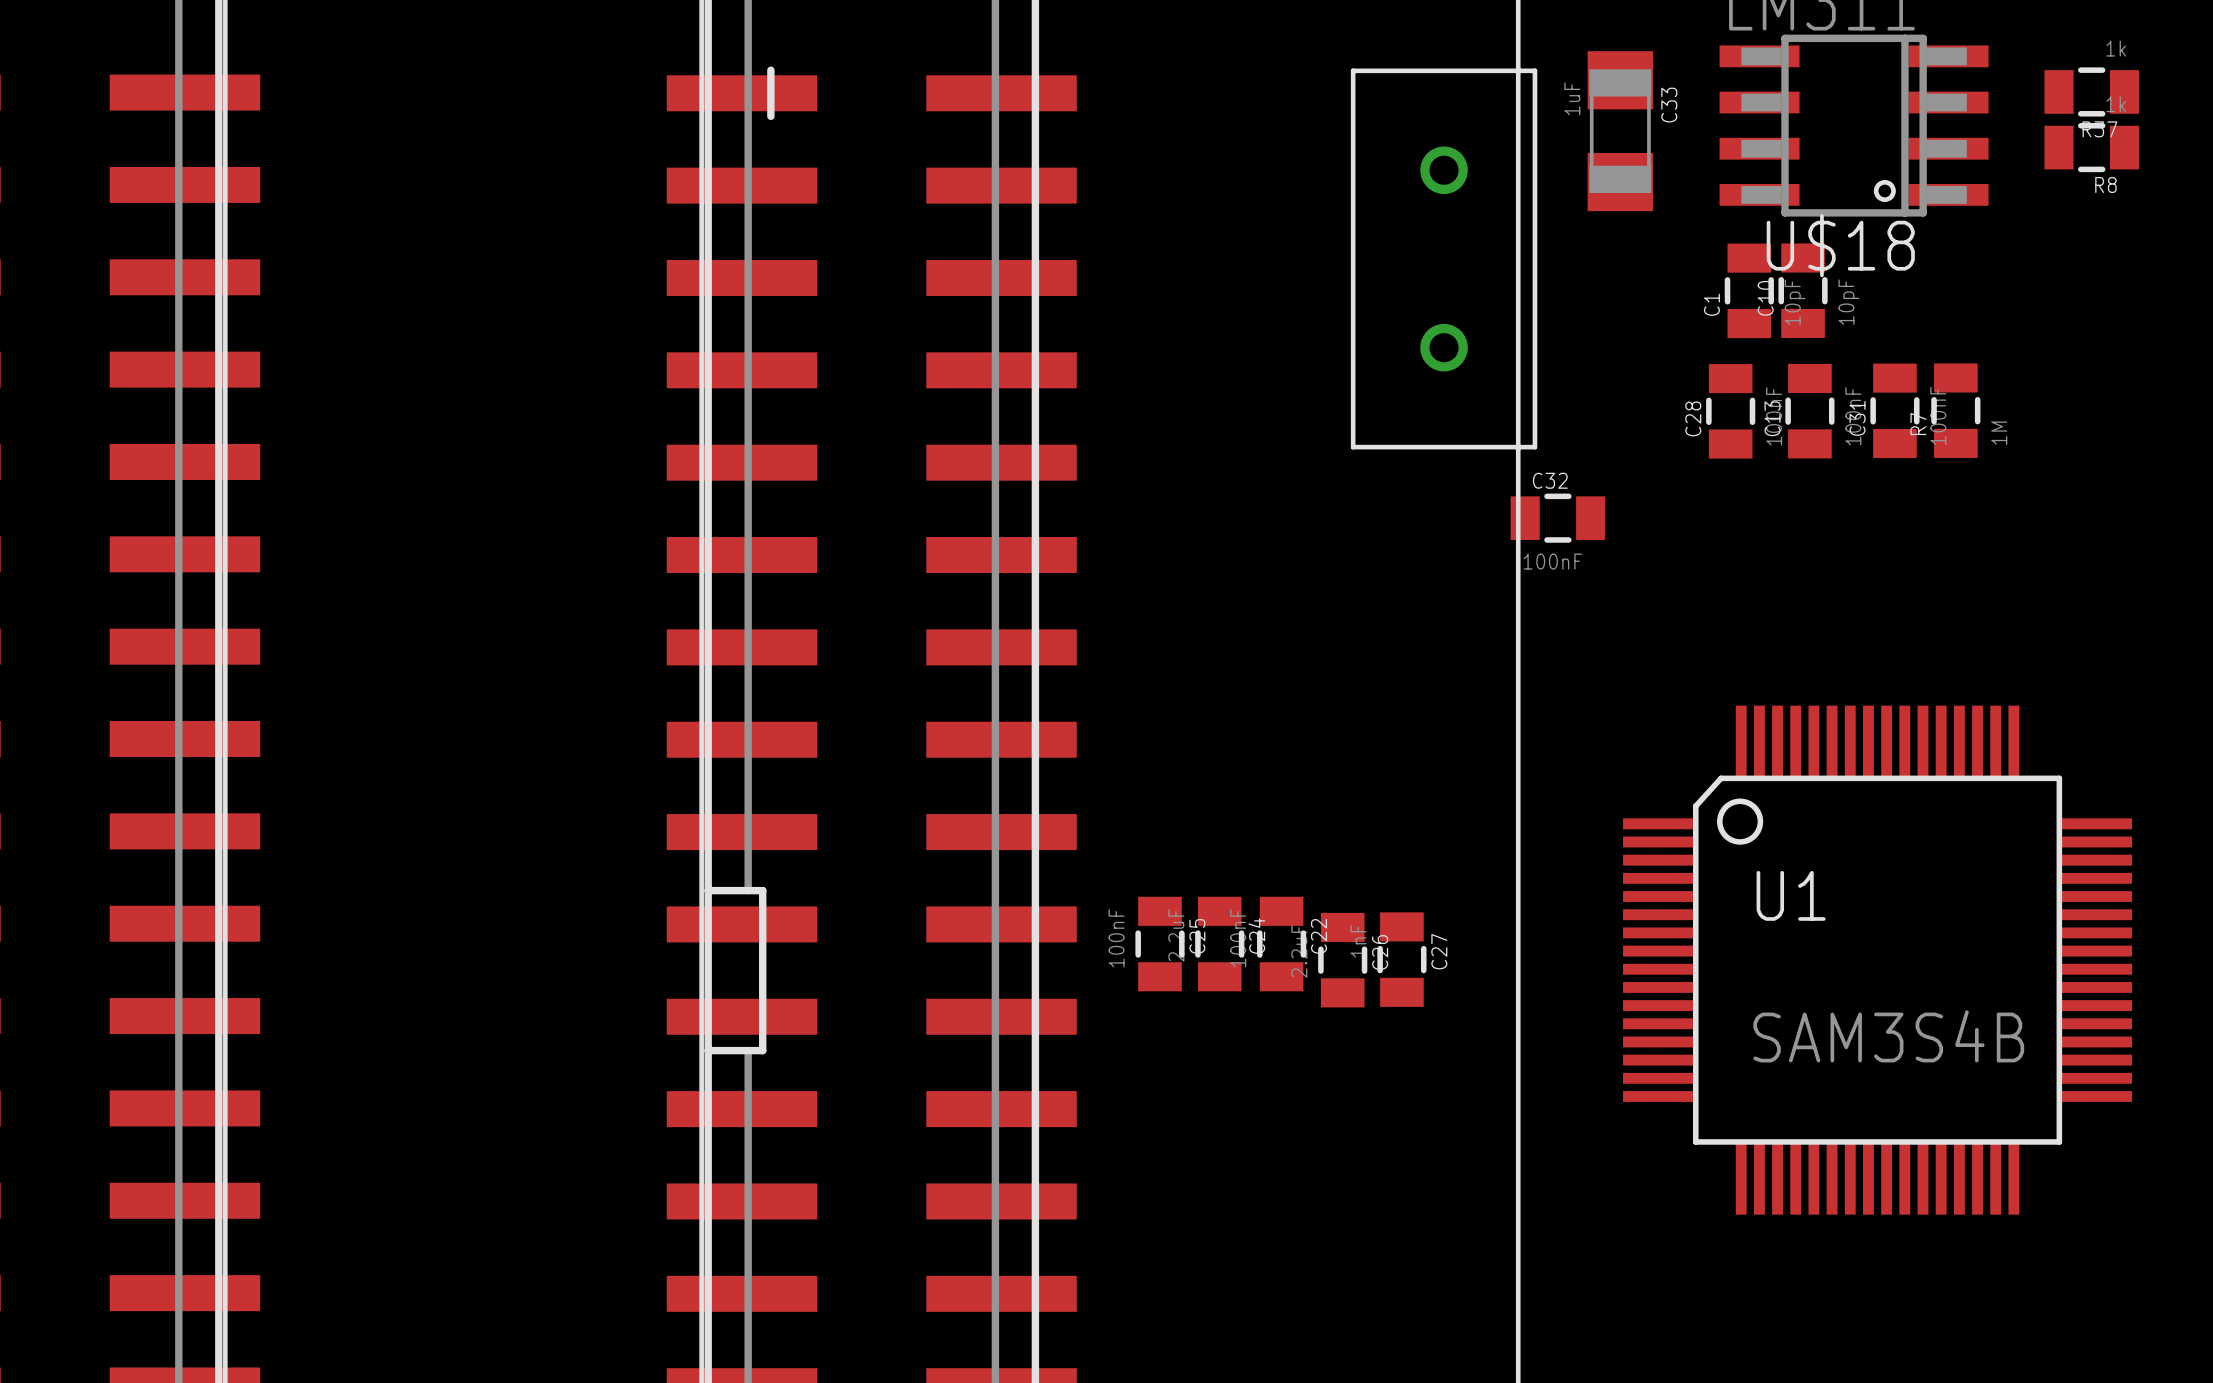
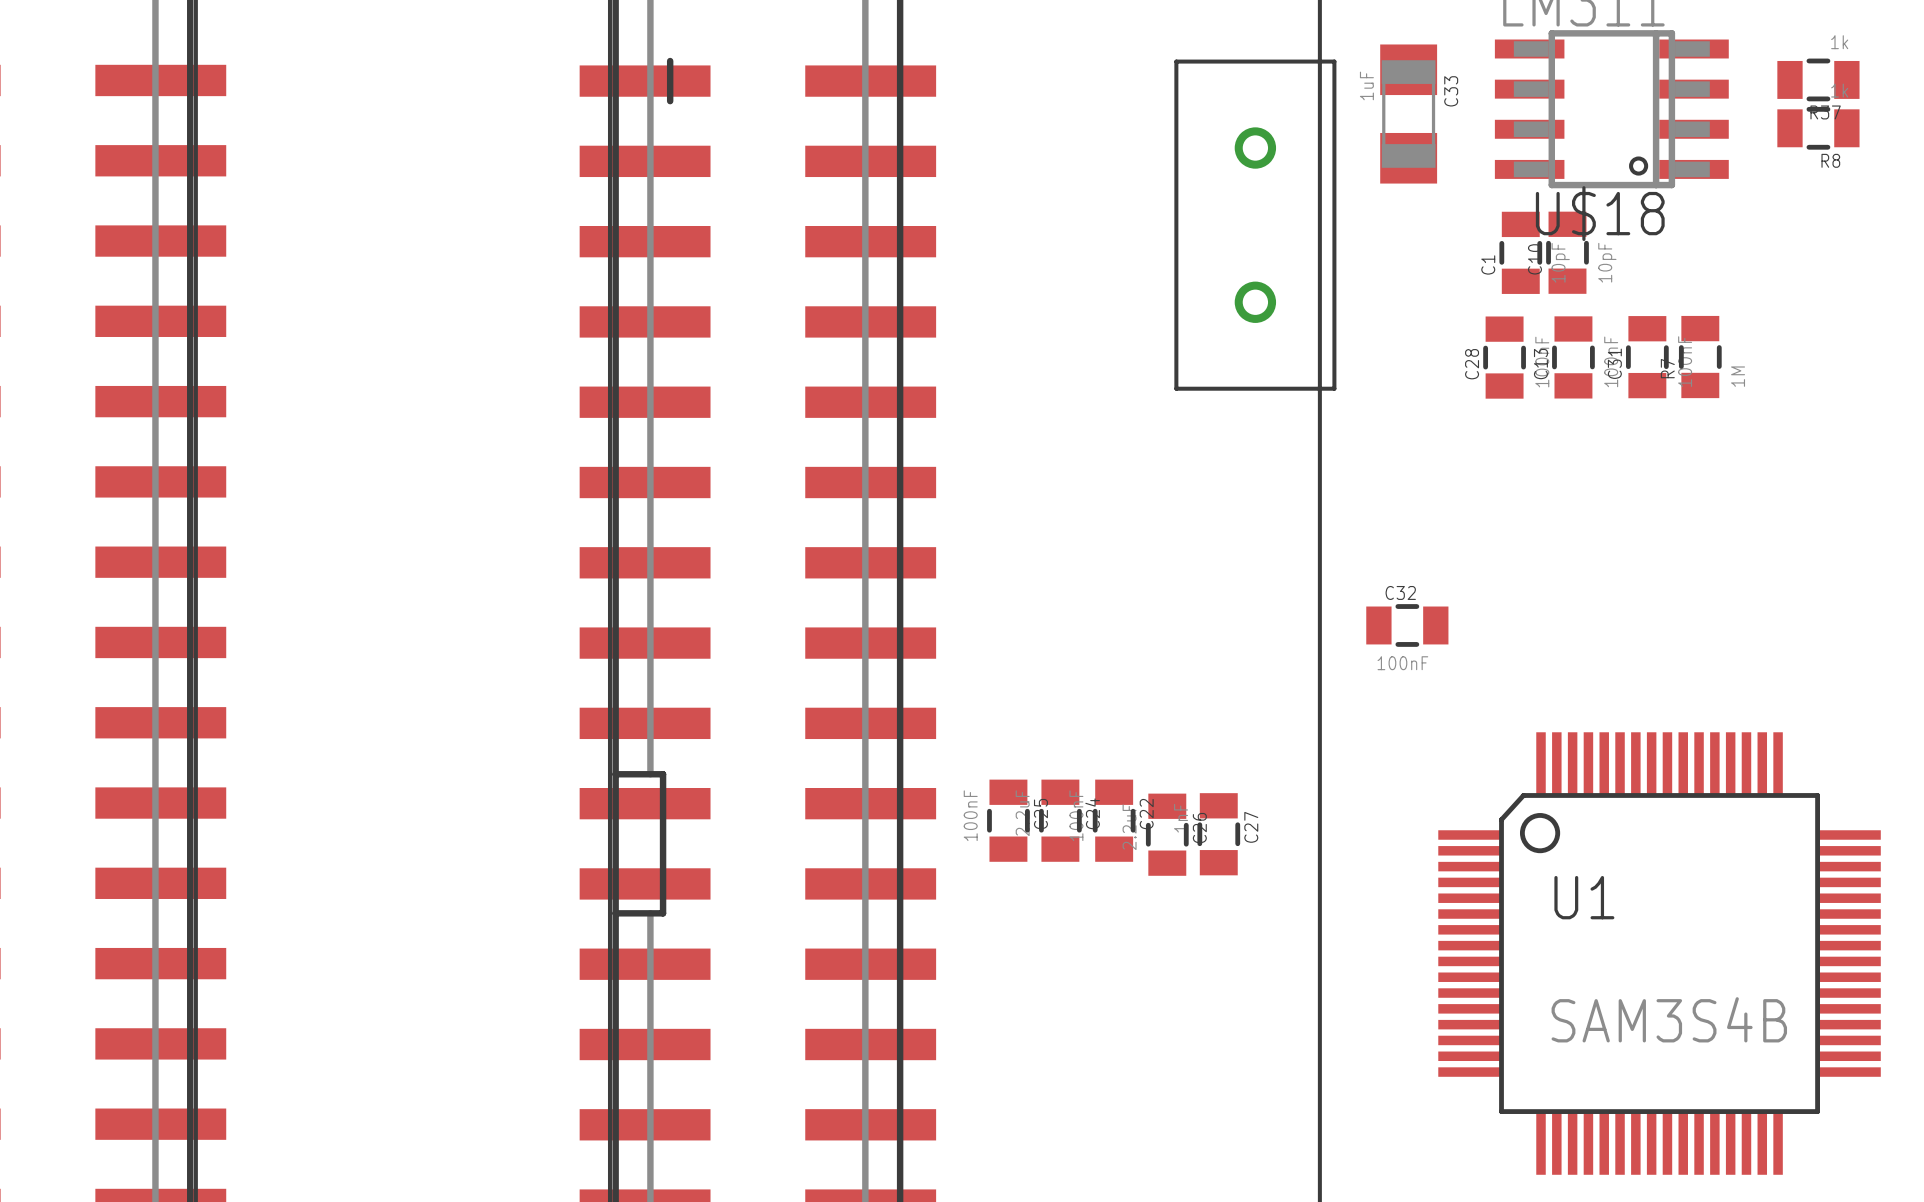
C32 position: (1557, 518) -> (1407, 625)
U1 position: (1877, 960) -> (1659, 953)

